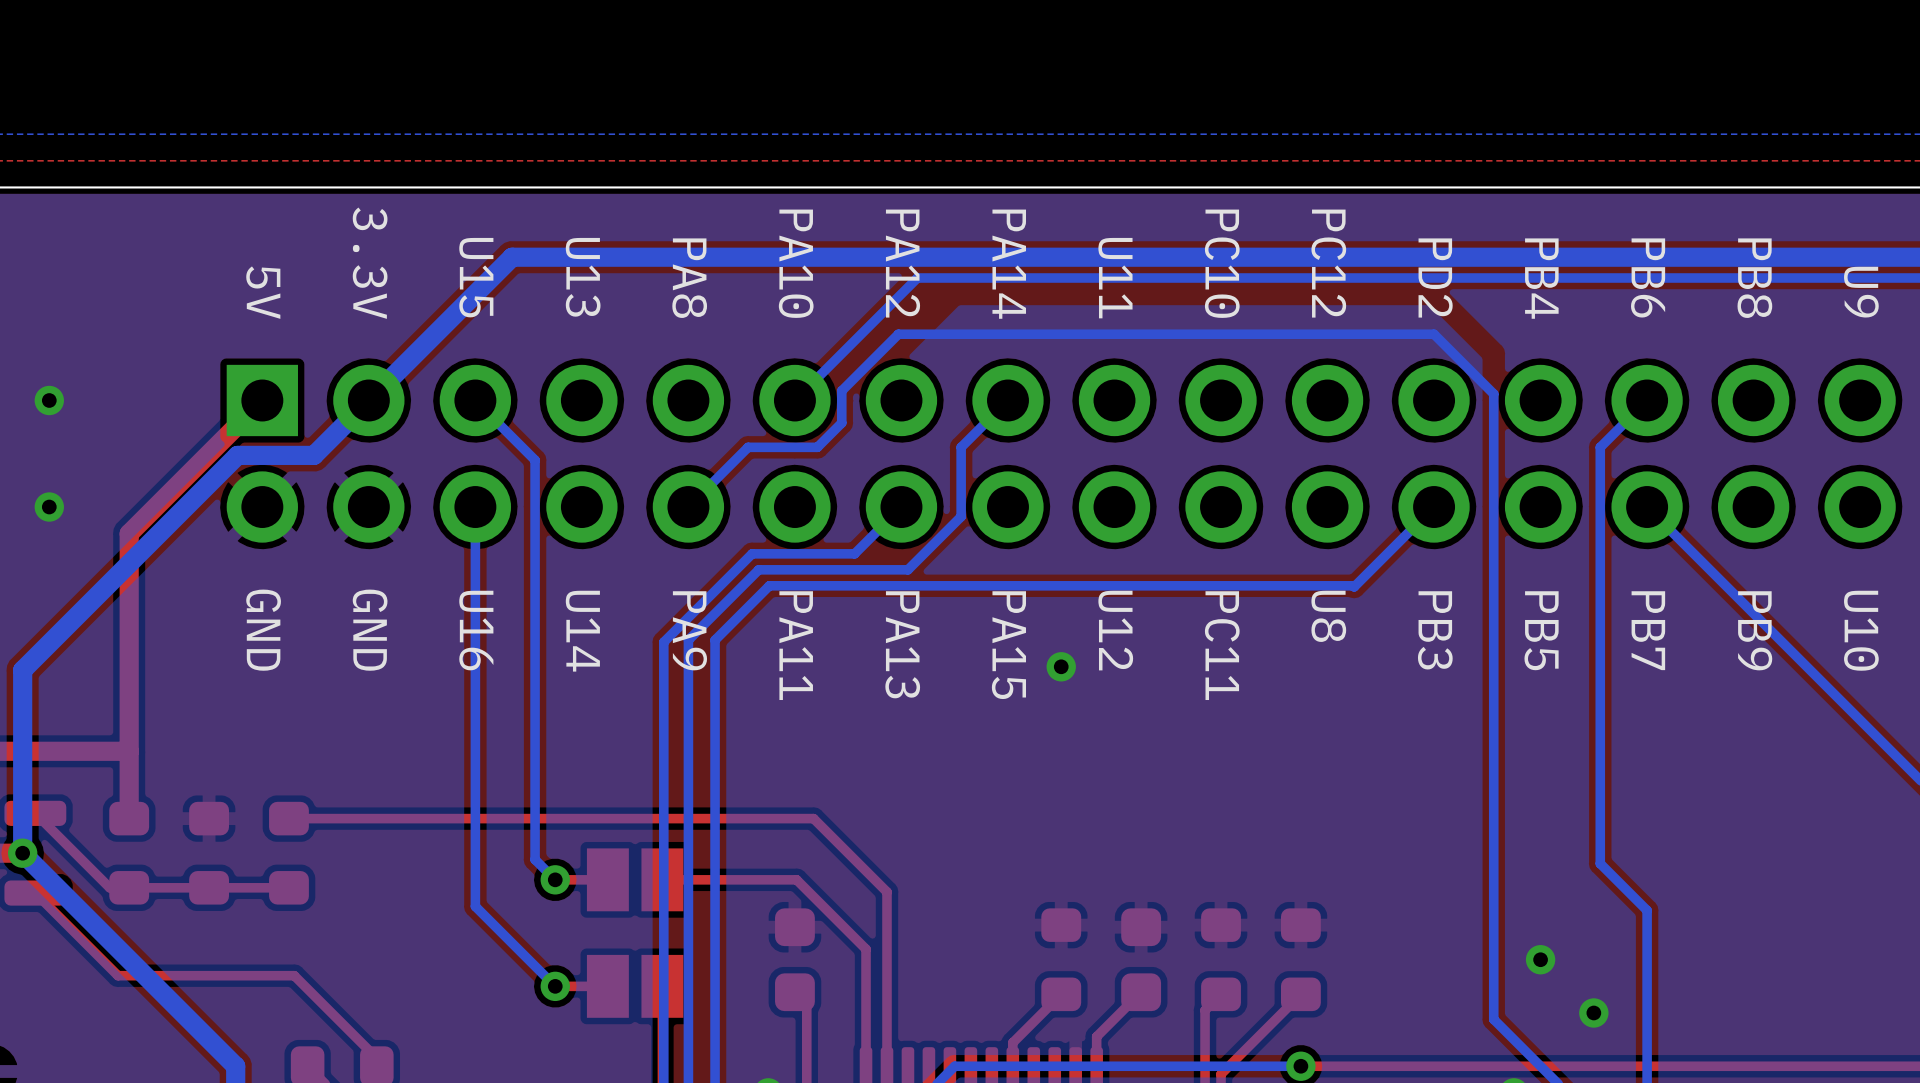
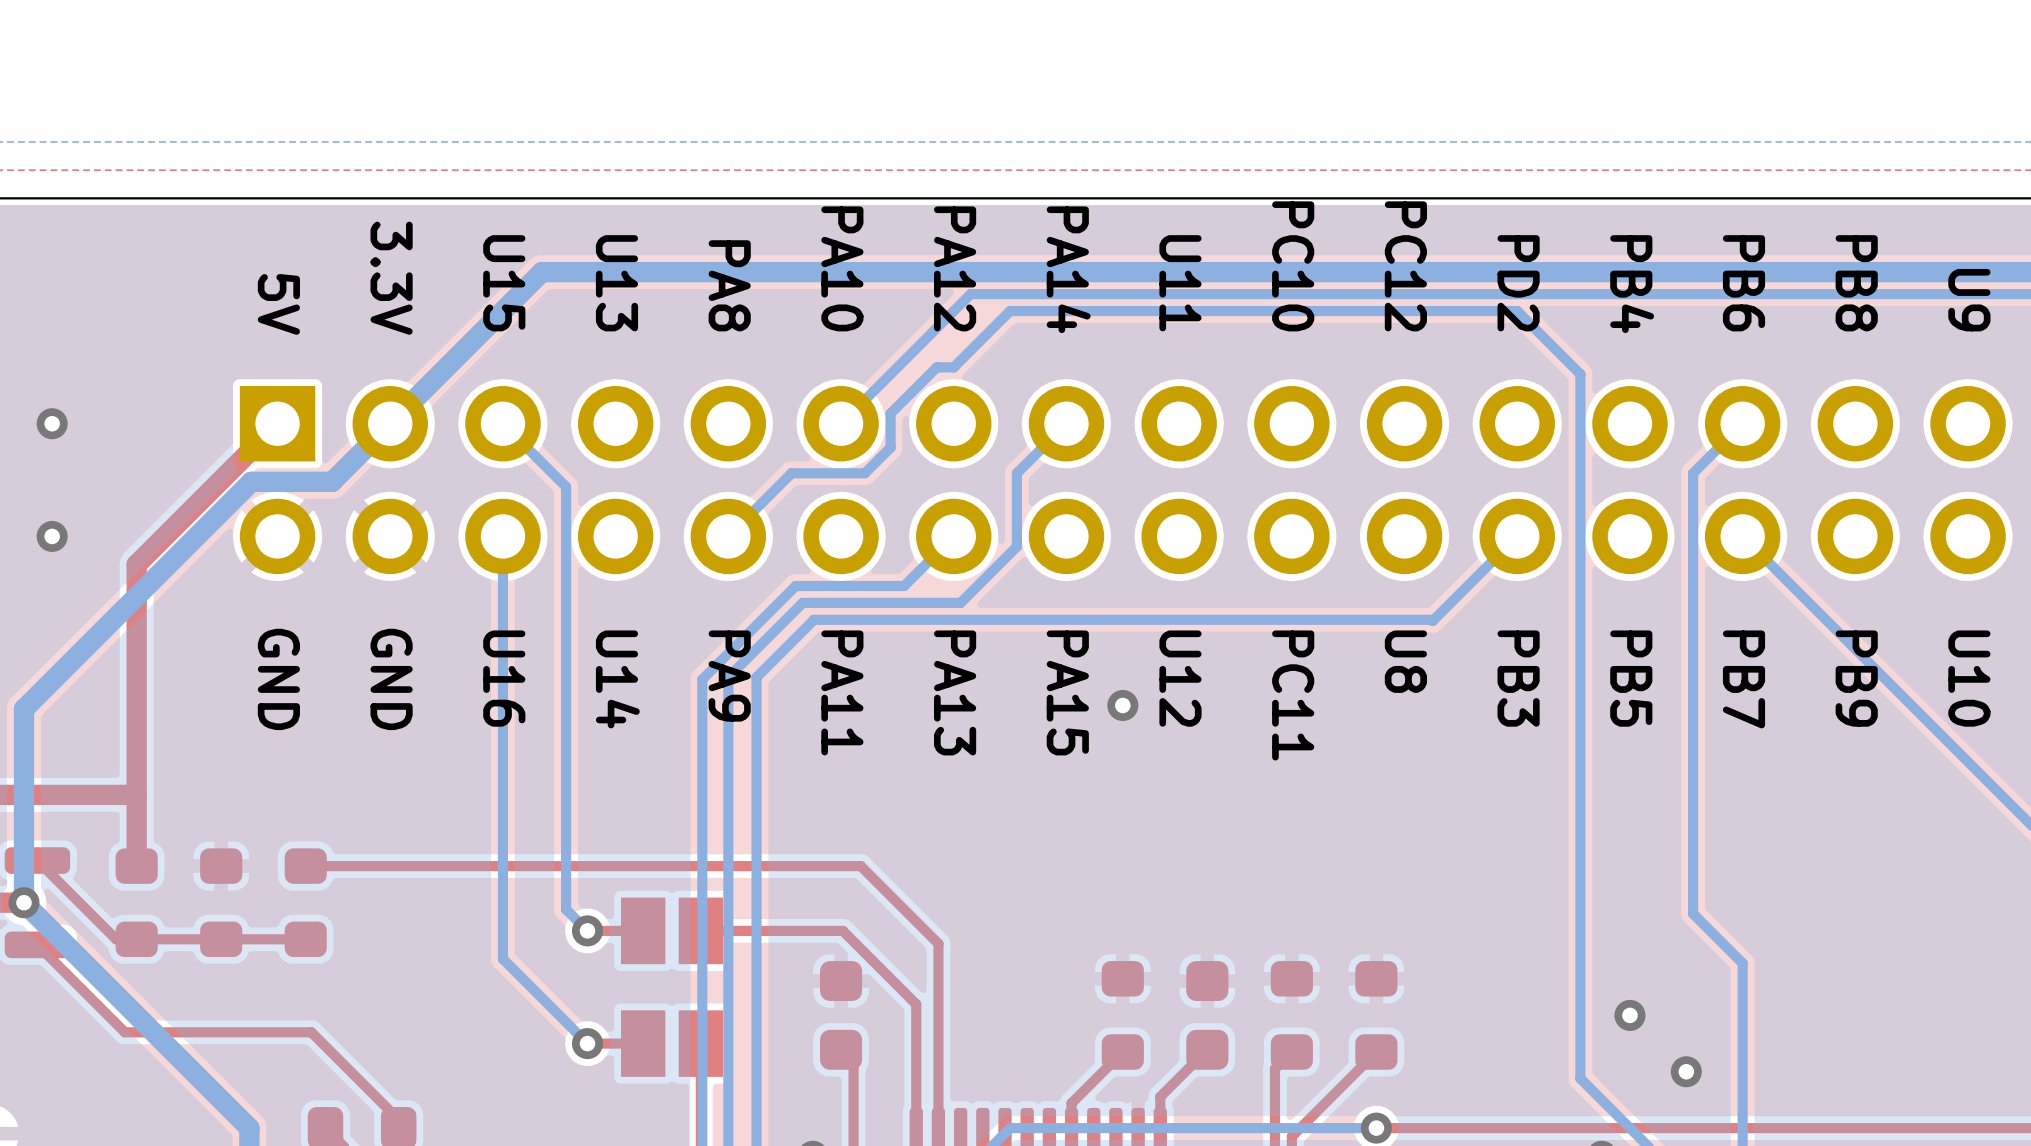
bottom track: (885, 347) (898, 334) (1434, 334) (1493, 393) -> (936, 367) (953, 367) (1010, 311) (1517, 311) (1580, 374) (1580, 416)

